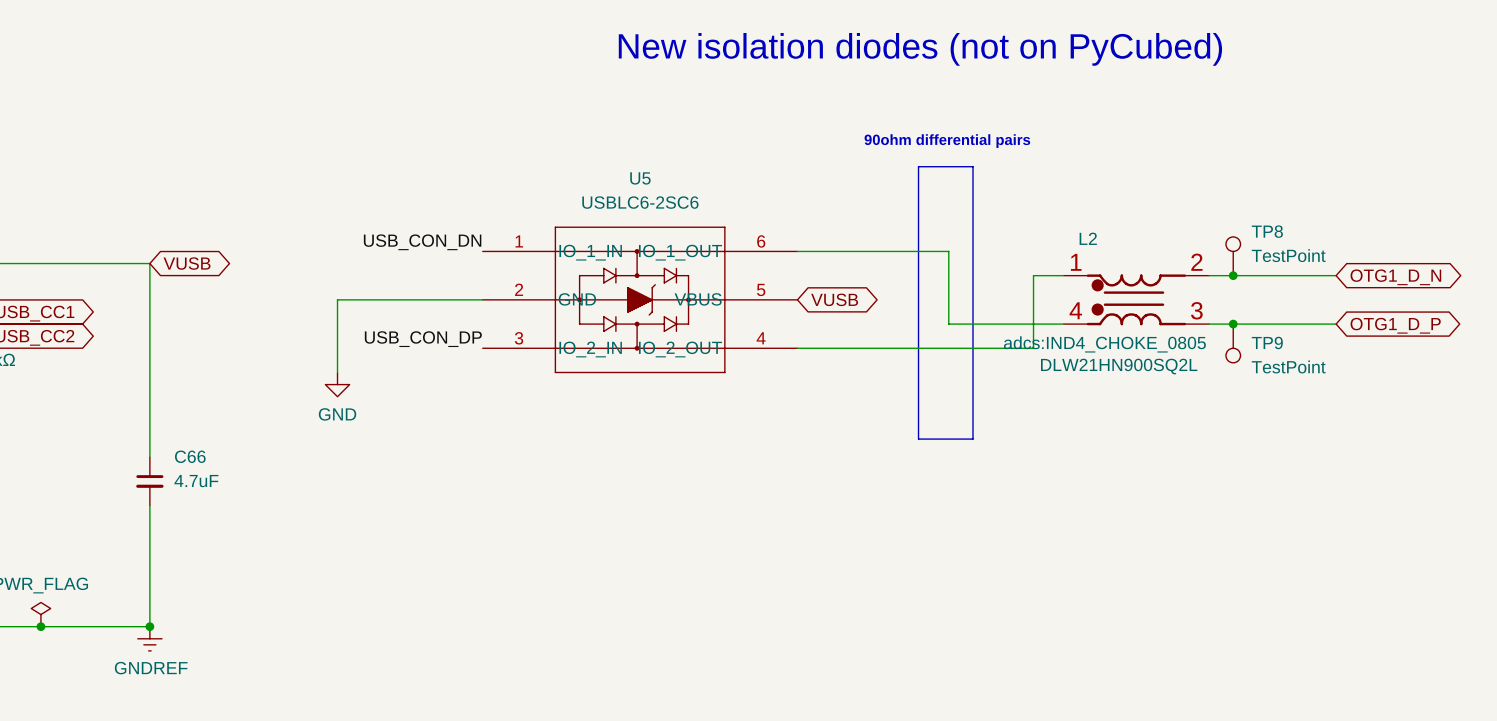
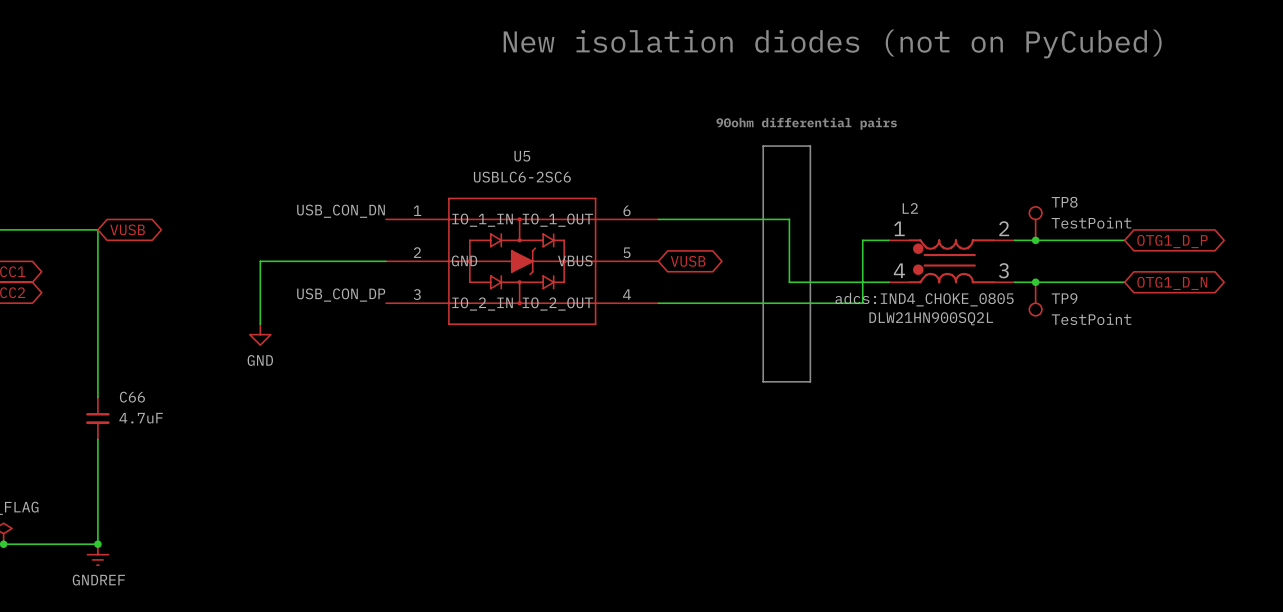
global label: OTG1_D_N (1395, 277) -> OTG1_D_P (1172, 241)
global label: OTG1_D_P (1395, 325) -> OTG1_D_N (1172, 283)

